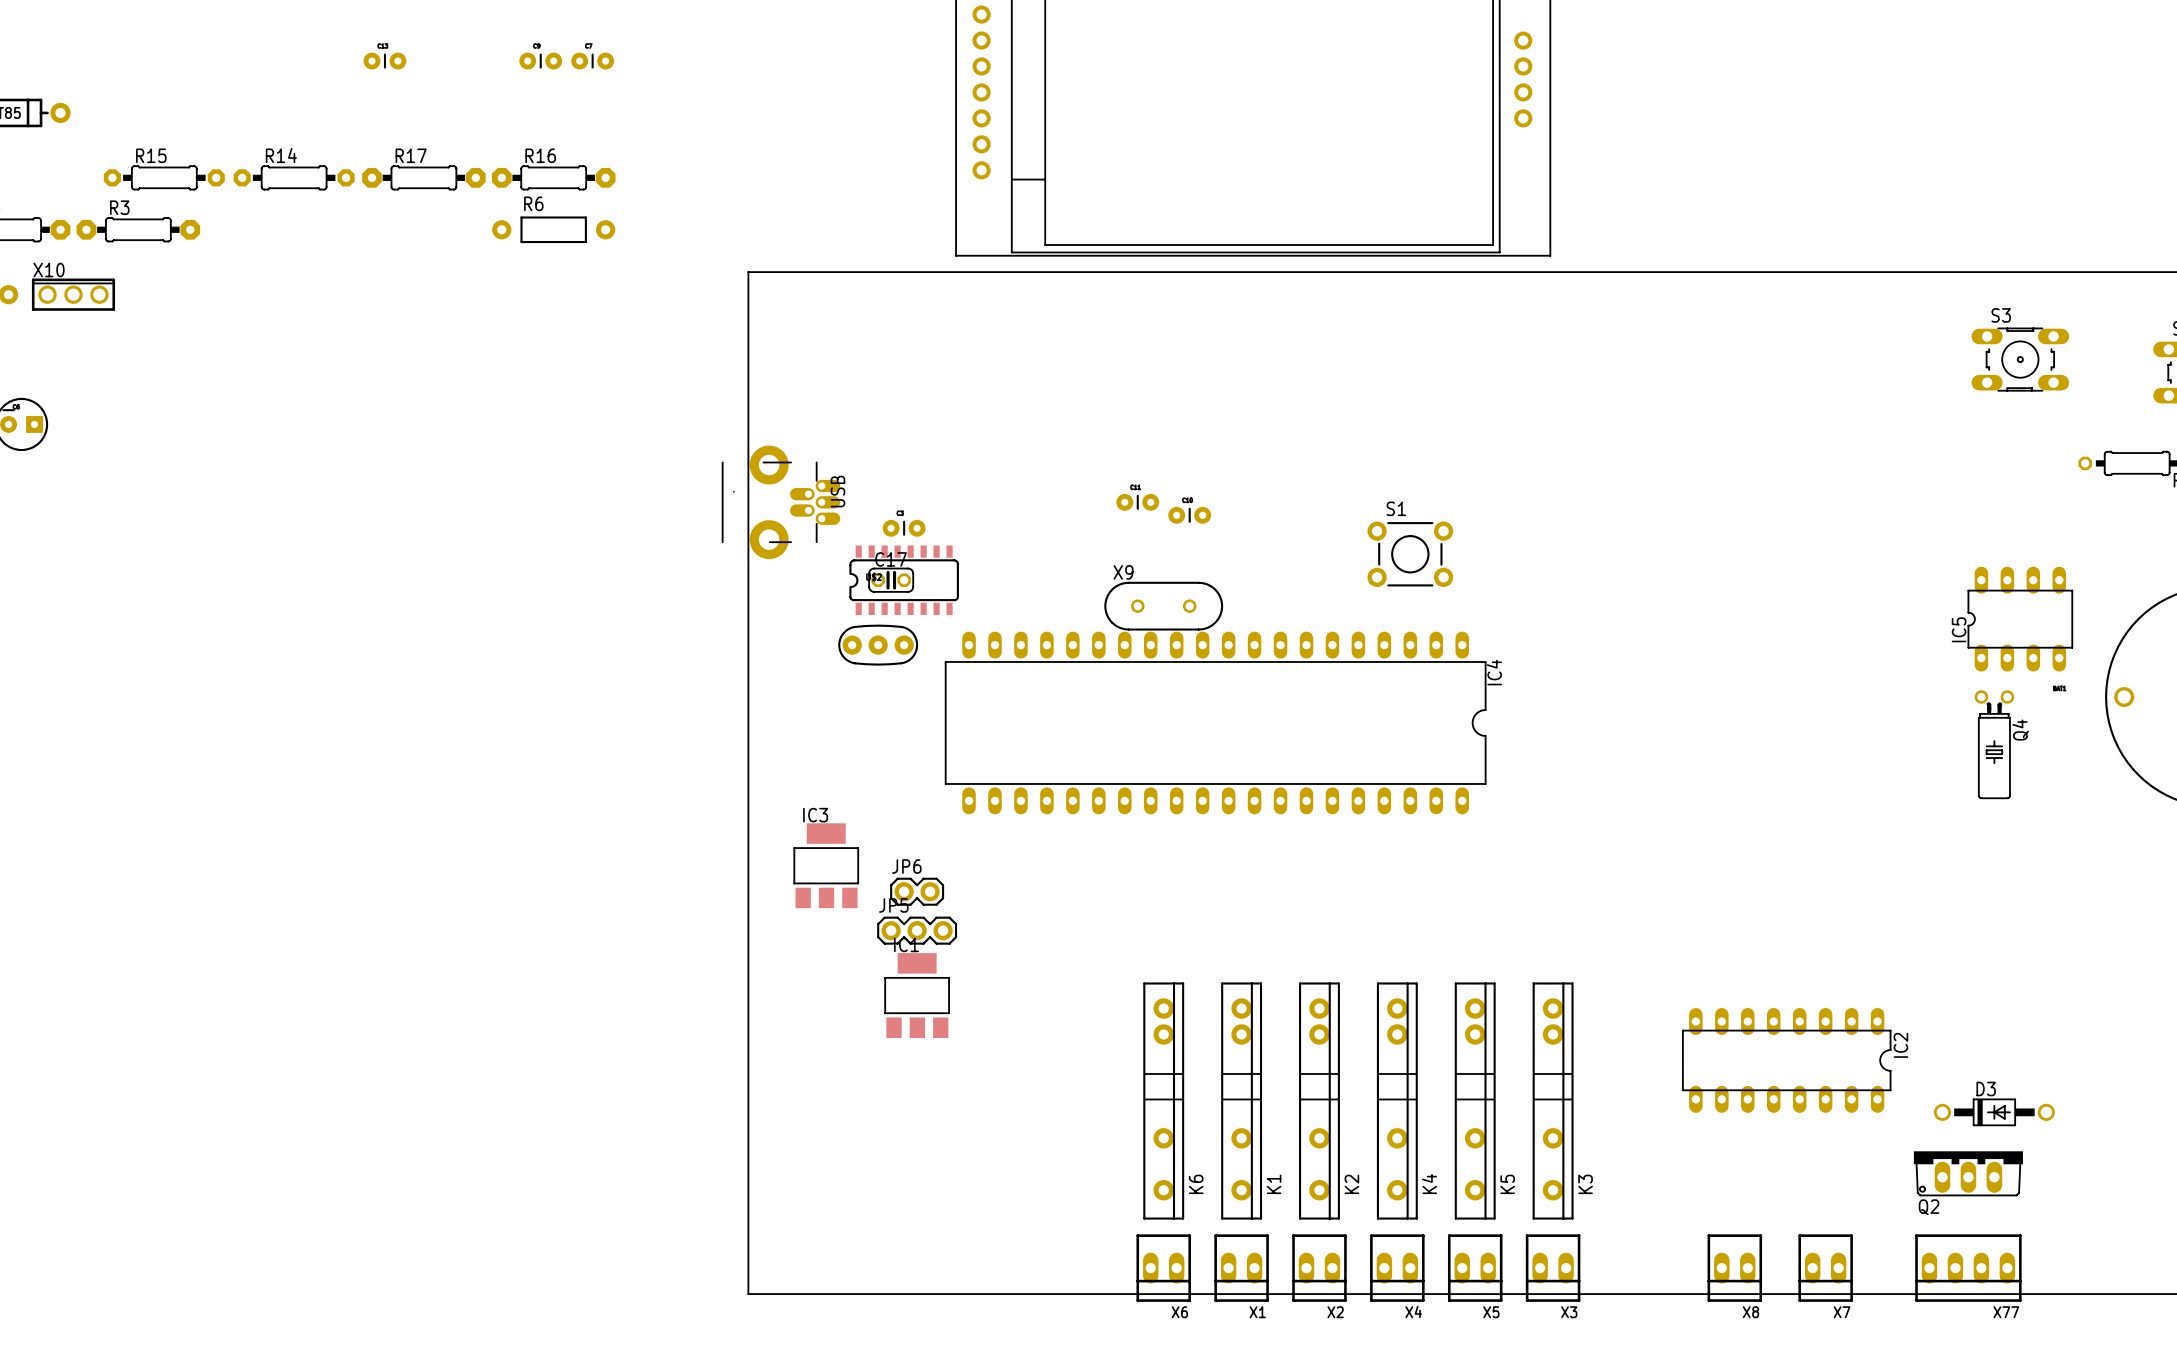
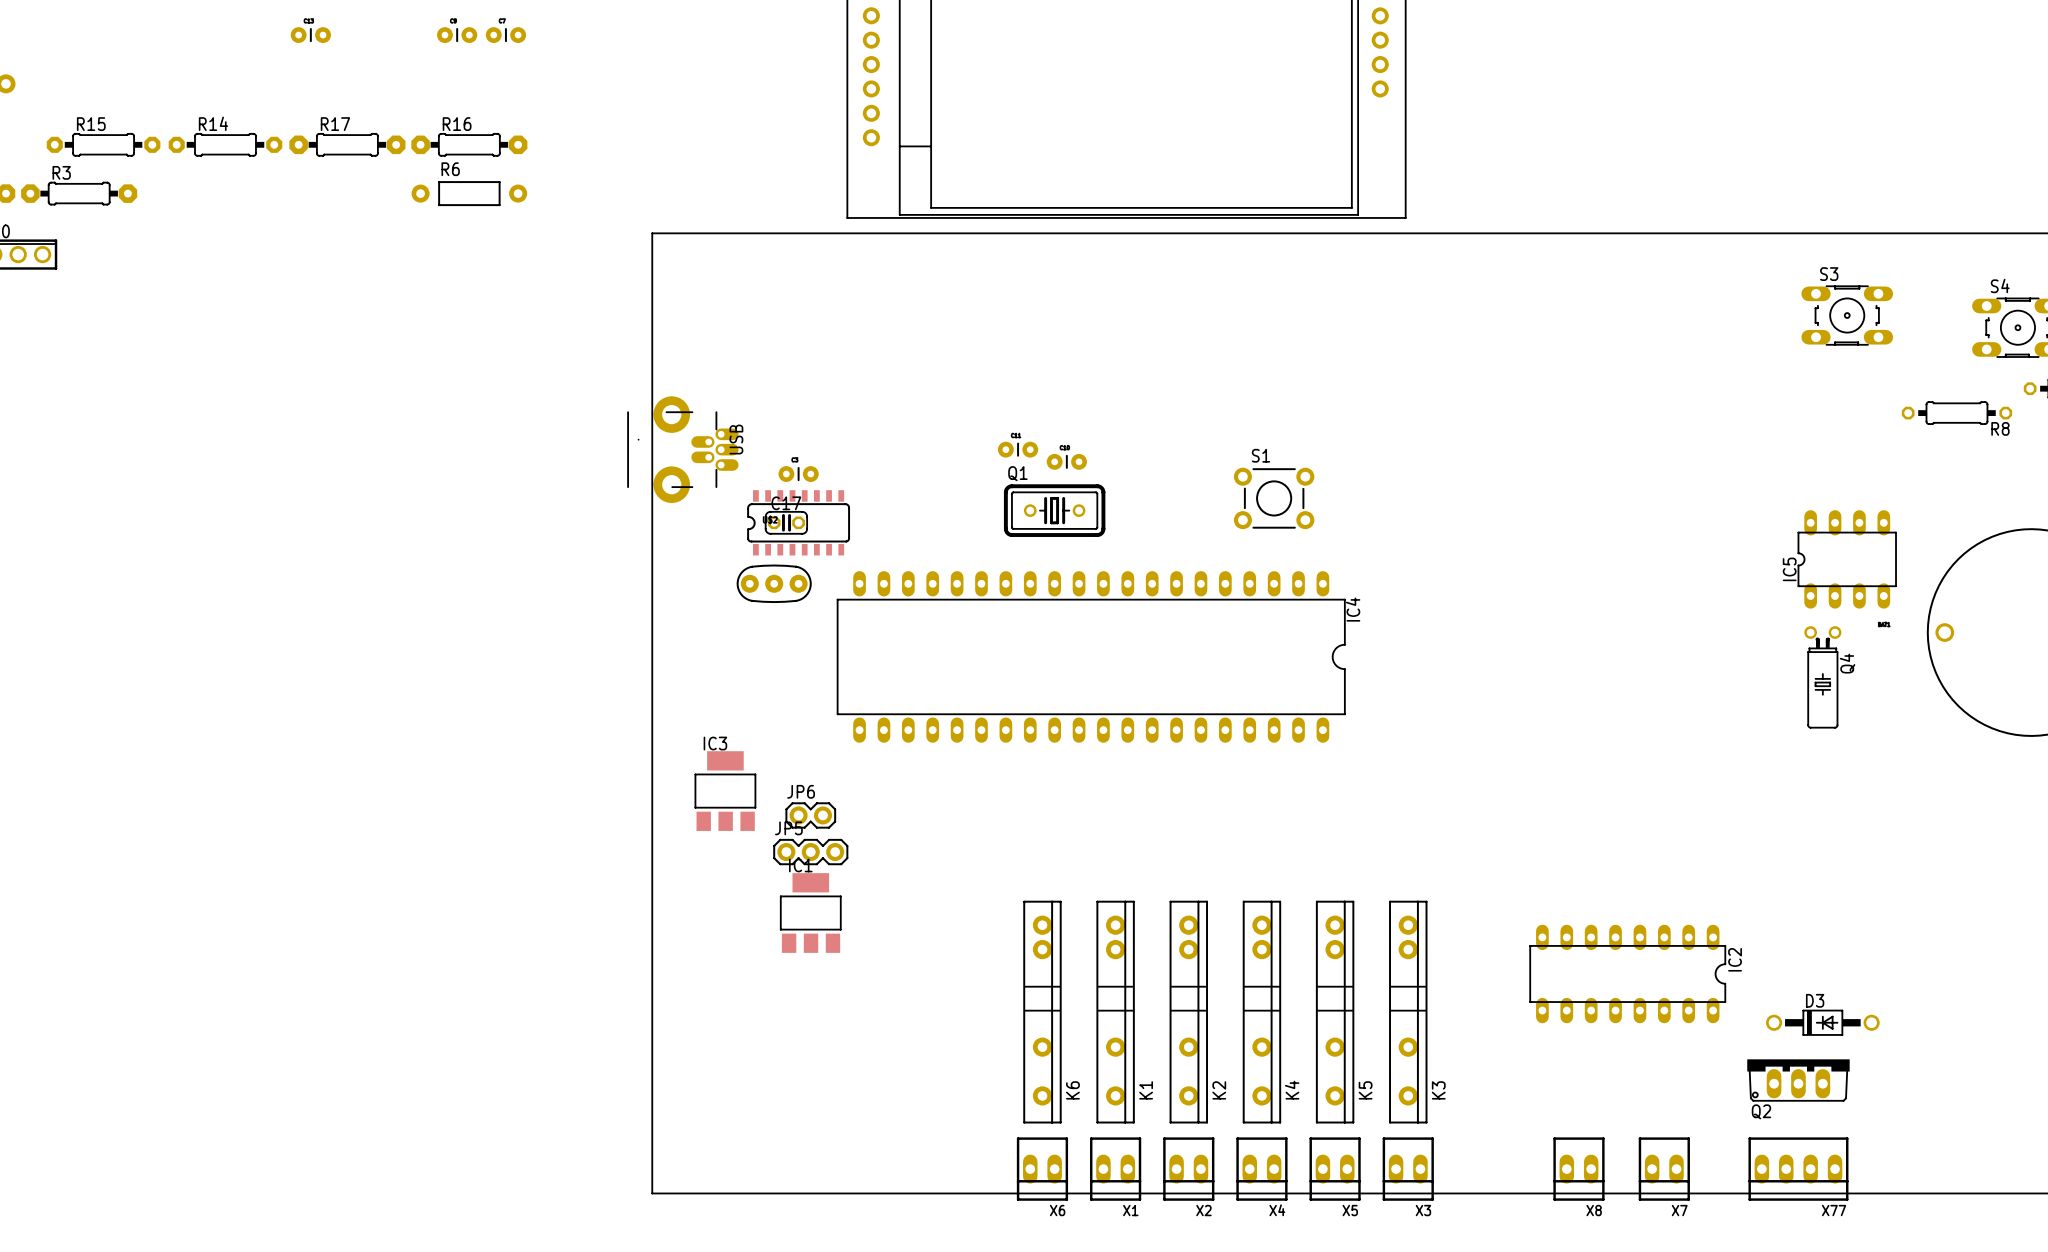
Q1: none -> (1054, 510)
X9: (1163, 606) -> none

